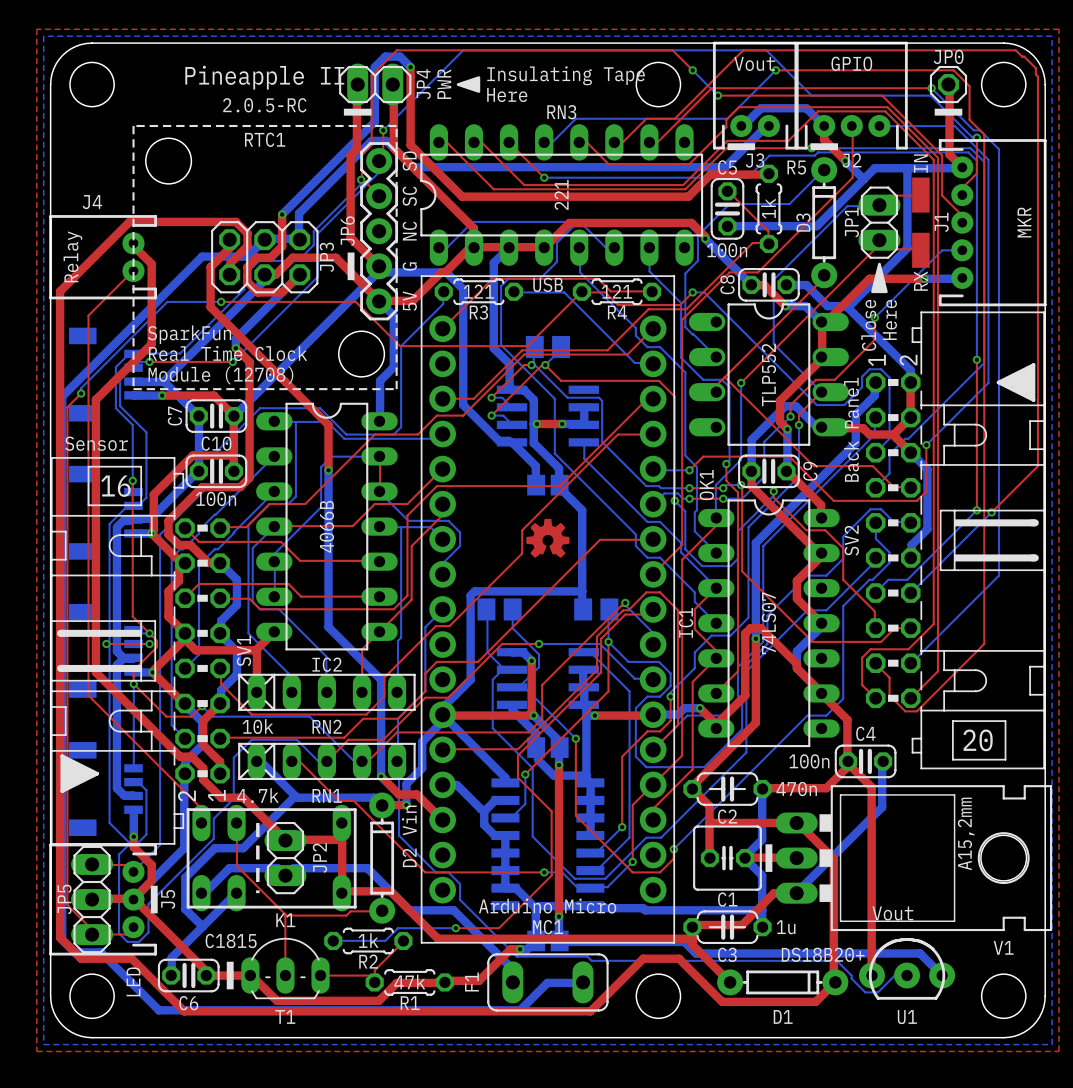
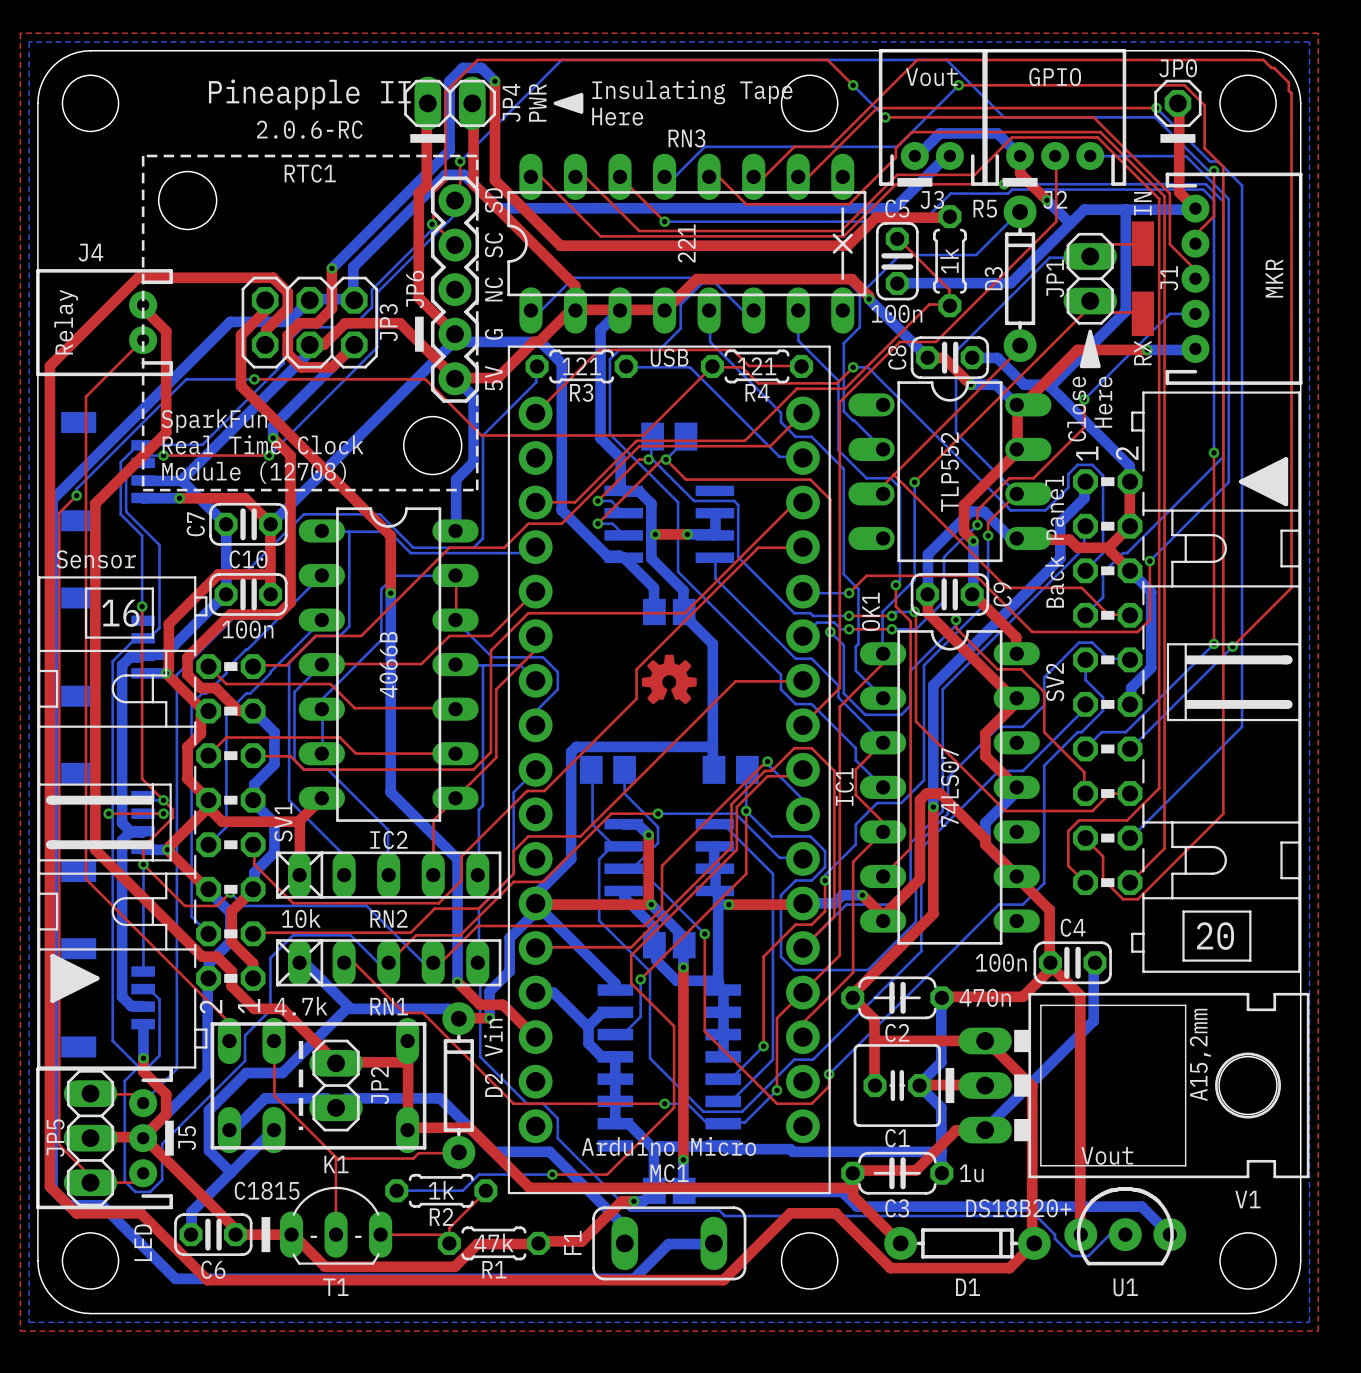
text: 2.0.5-RC (264, 105) -> 2.0.6-RC (309, 129)
line: none -> (842, 208) (842, 234)
line: none -> (833, 234) (851, 252)
line: none -> (851, 234) (833, 252)
line: none -> (842, 252) (842, 278)

